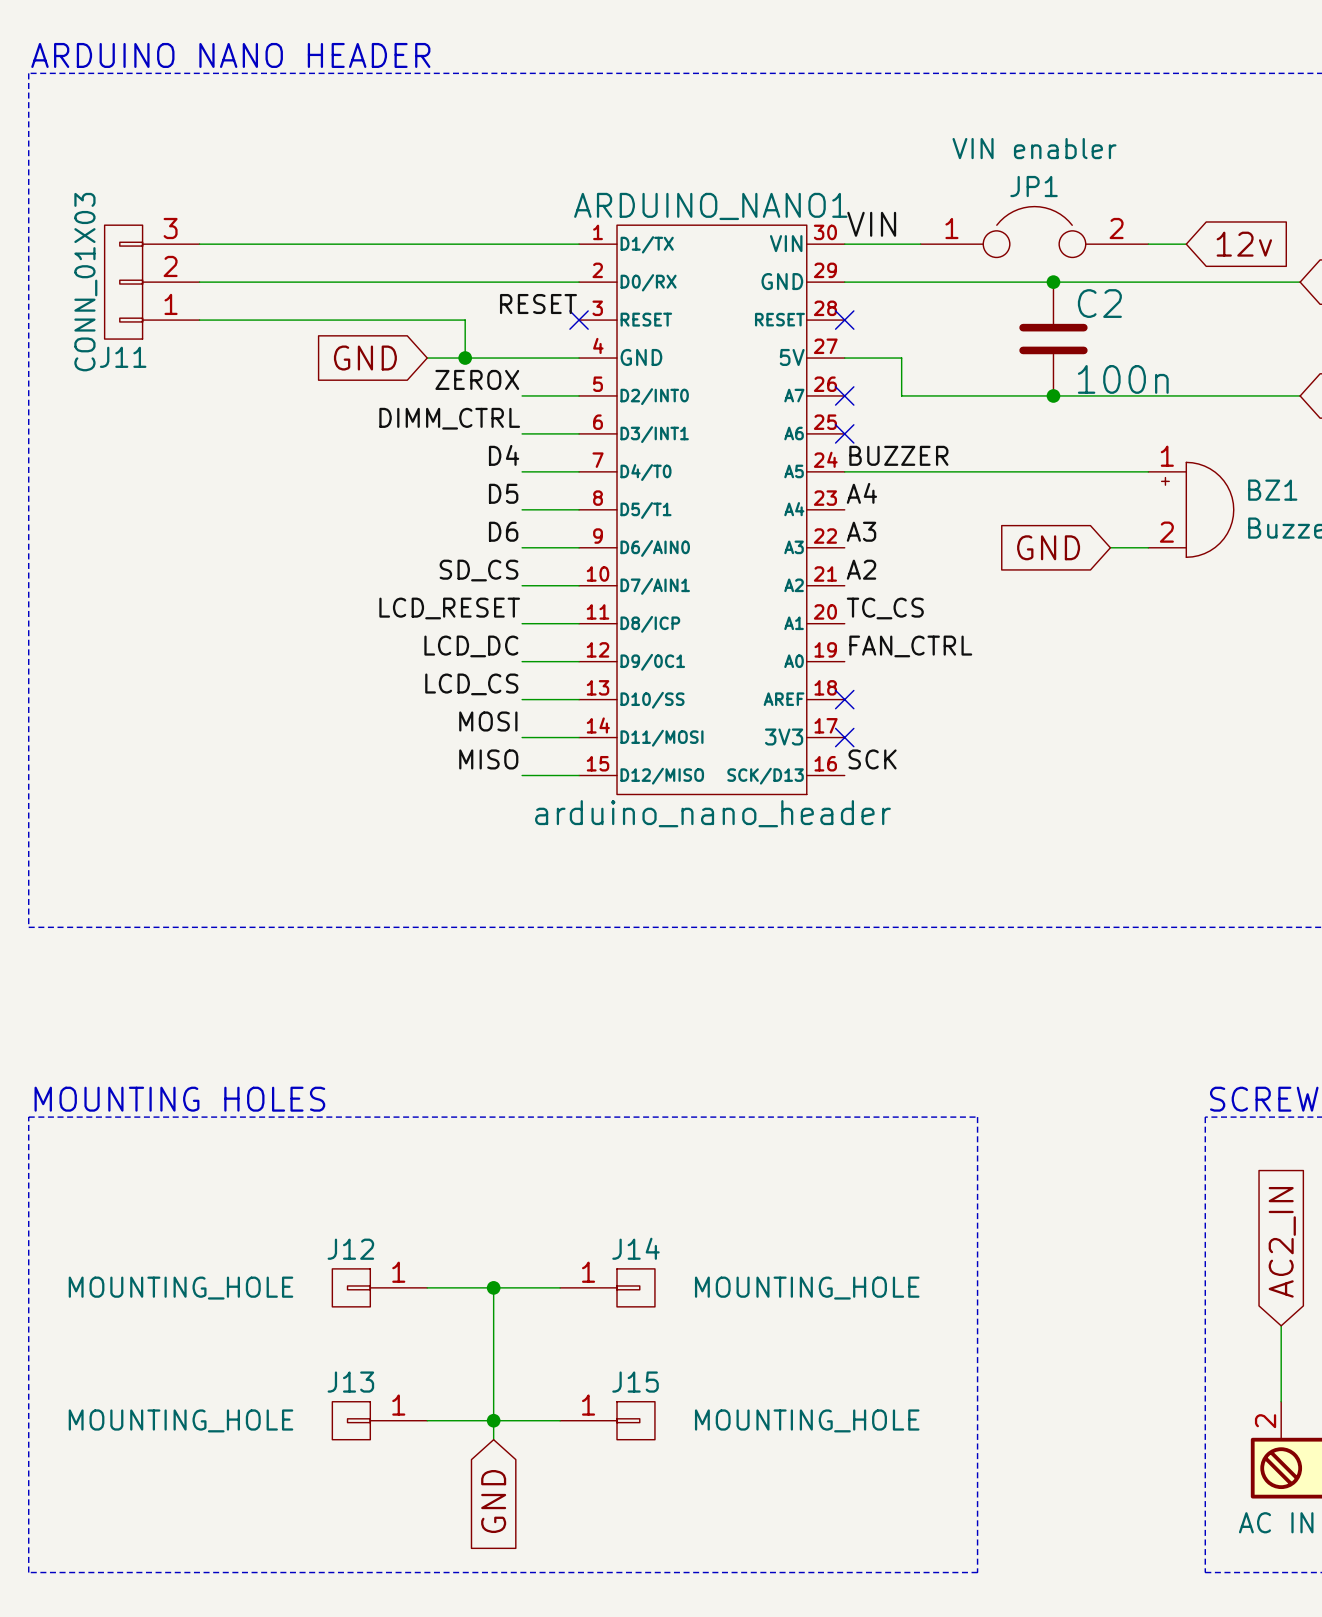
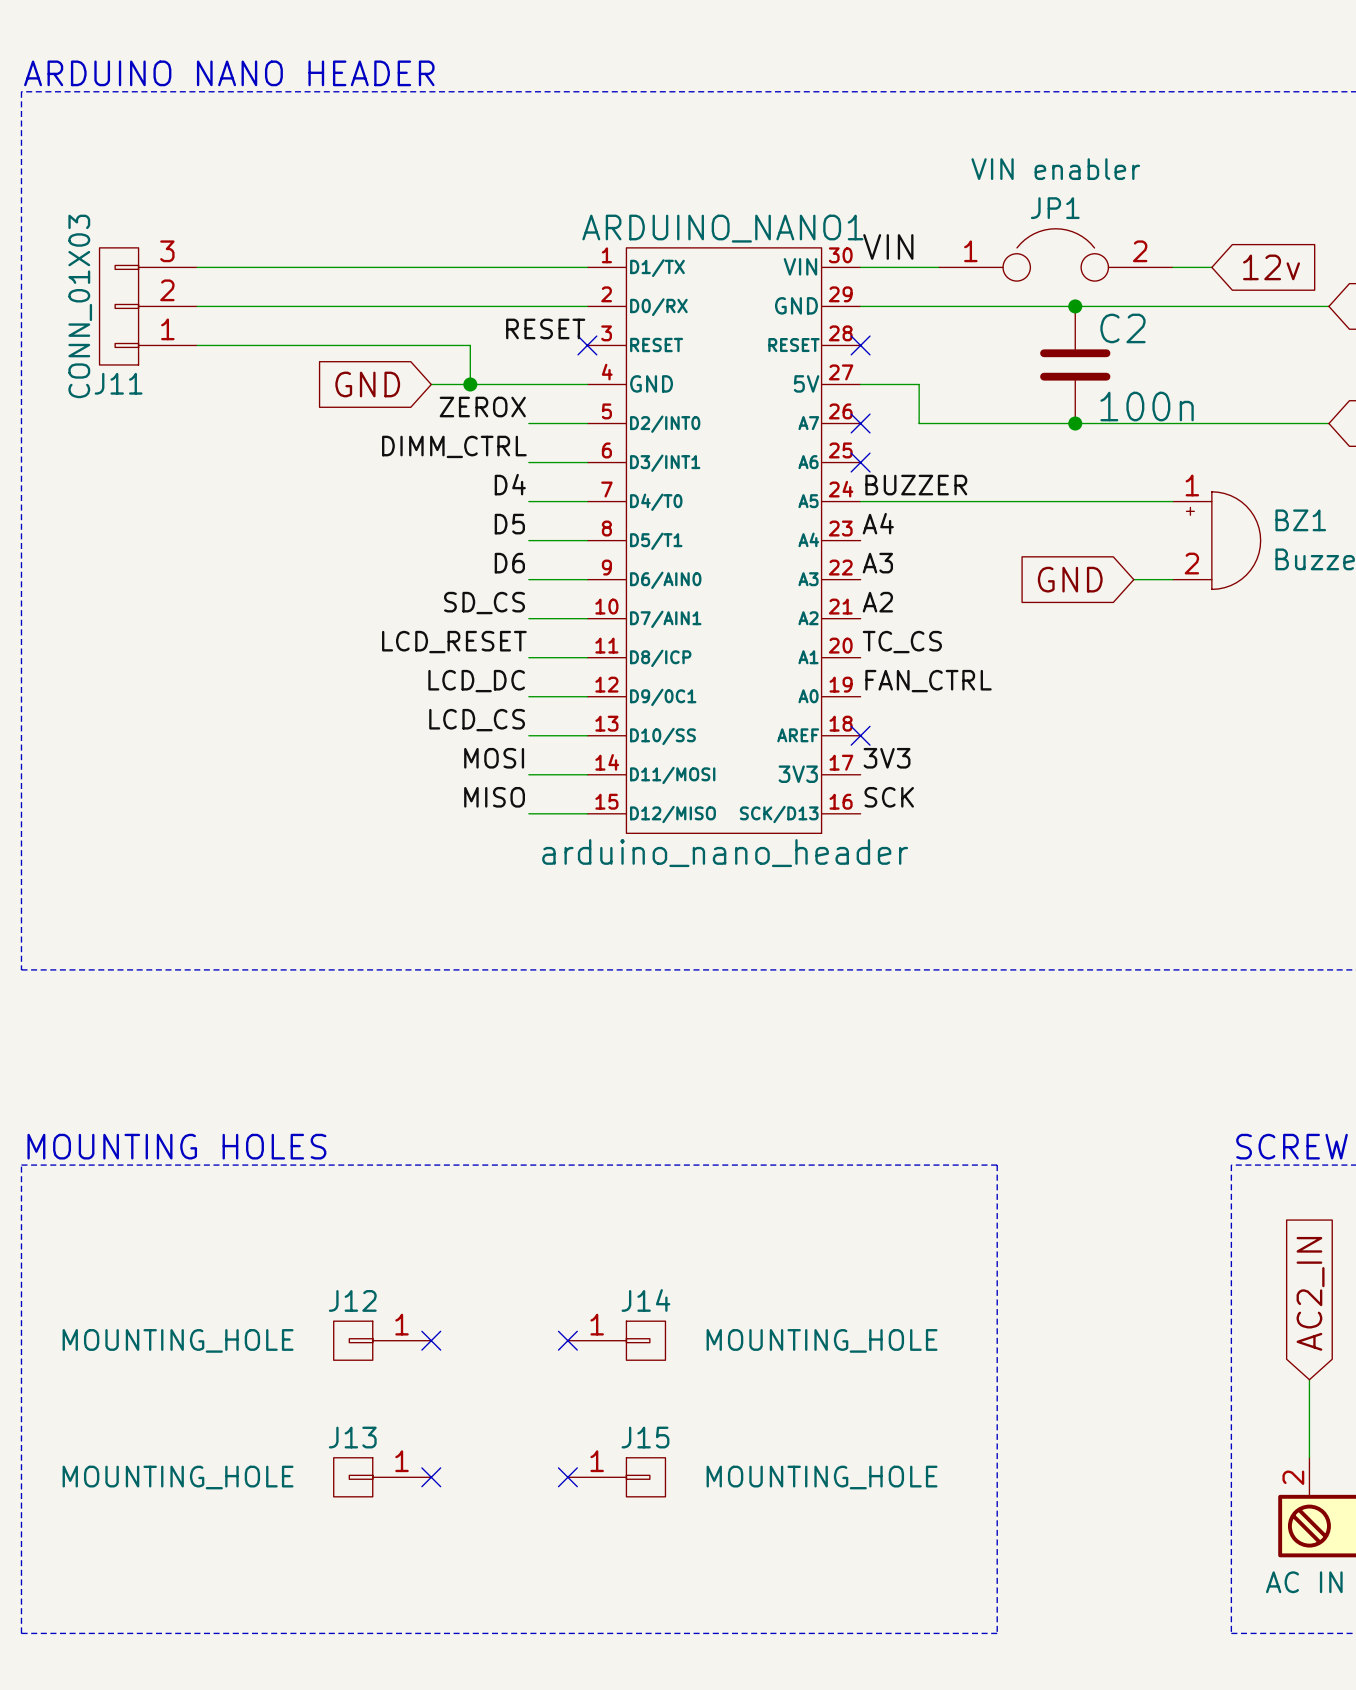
label: none -> 3V3 (887, 758)
no-connect mark: (844, 737) -> none
wire: (427, 1287) (560, 1287) -> none
no-connect mark: none -> (431, 1340)
wire: (493, 1287) (493, 1439) -> none
junction: (493, 1287) -> none
no-connect mark: none -> (567, 1340)
wire: (427, 1420) (560, 1420) -> none
no-connect mark: none -> (431, 1477)
junction: (493, 1420) -> none
no-connect mark: none -> (567, 1477)
global label: GND (493, 1501) -> none

